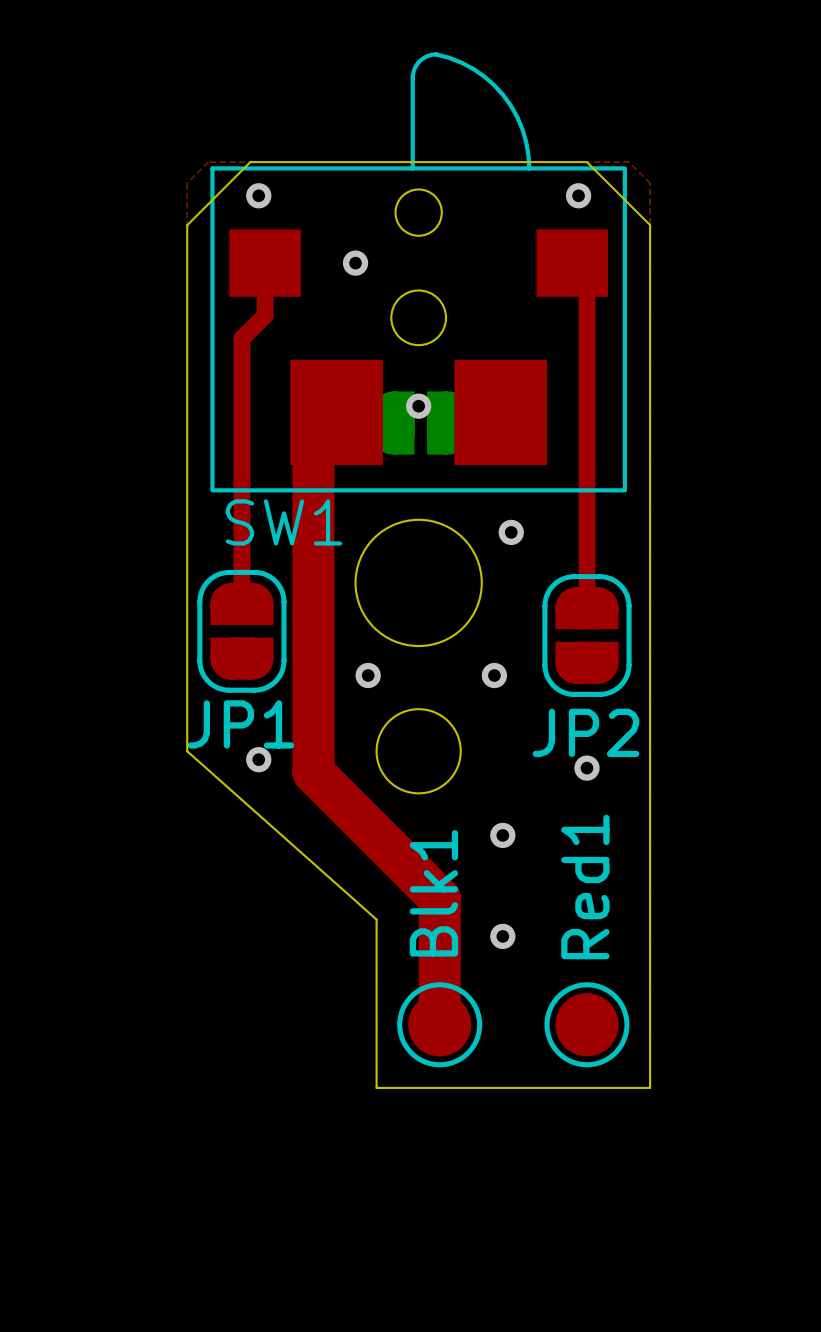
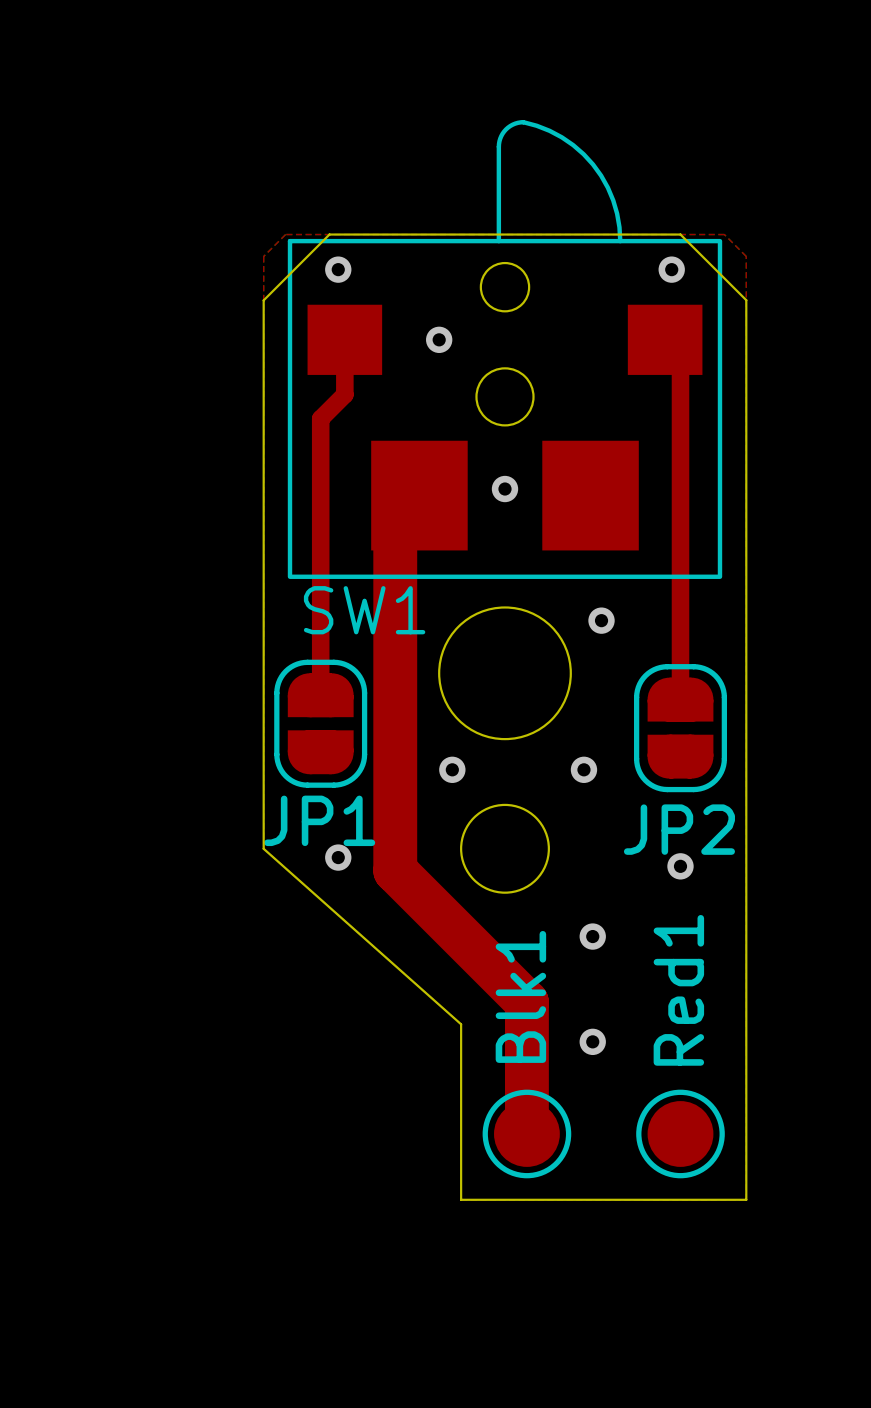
part: (420, 423) -> none

